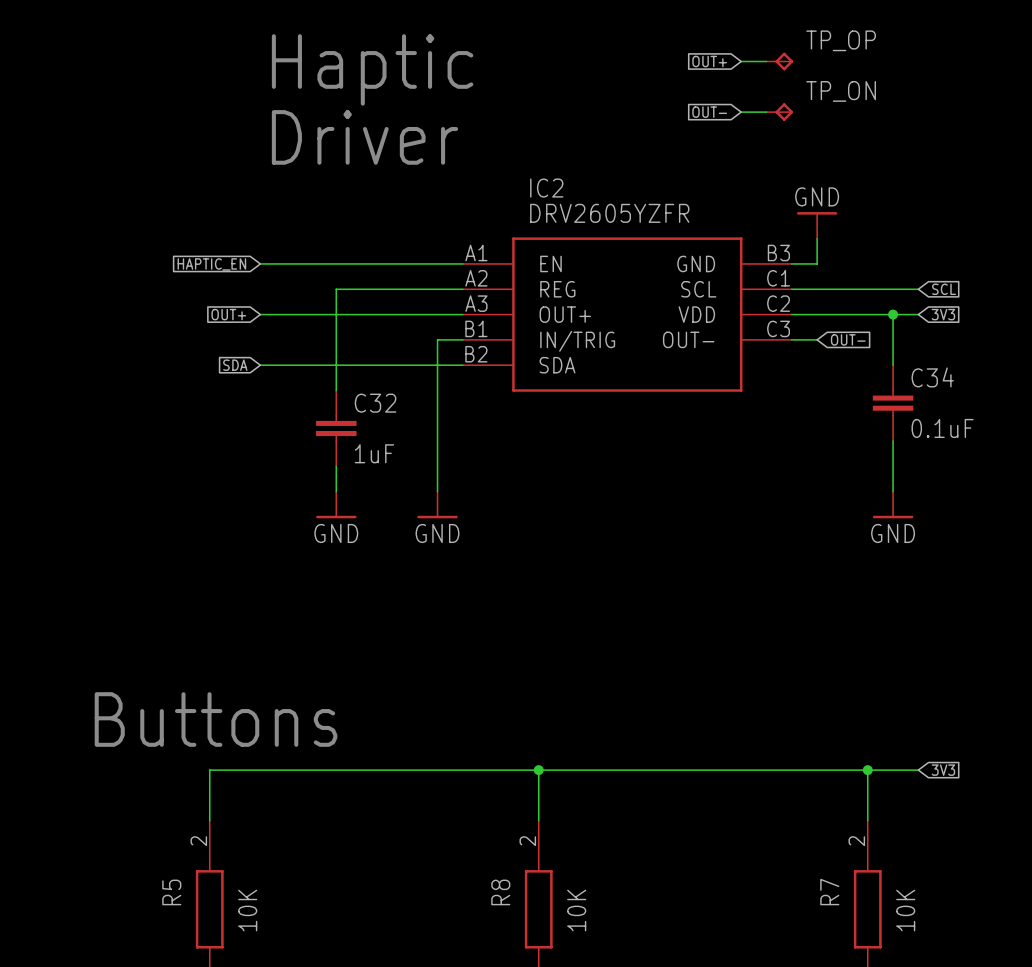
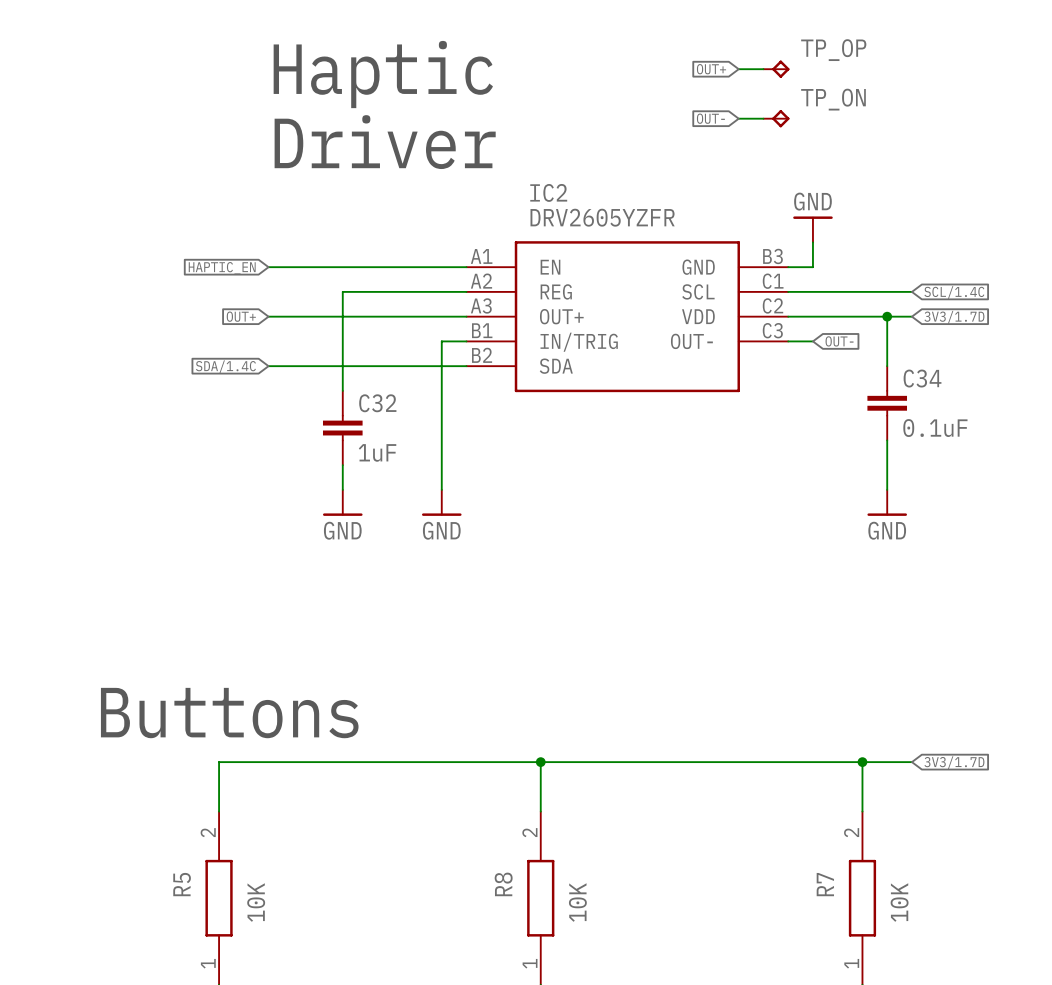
global label: SCL (944, 289) -> SCL/1.4C (954, 292)
global label: 3V3 (943, 314) -> 3V3/1.7D (954, 317)
global label: SDA (235, 365) -> SDA/1.4C (225, 366)
global label: 3V3 (943, 770) -> 3V3/1.7D (954, 762)

